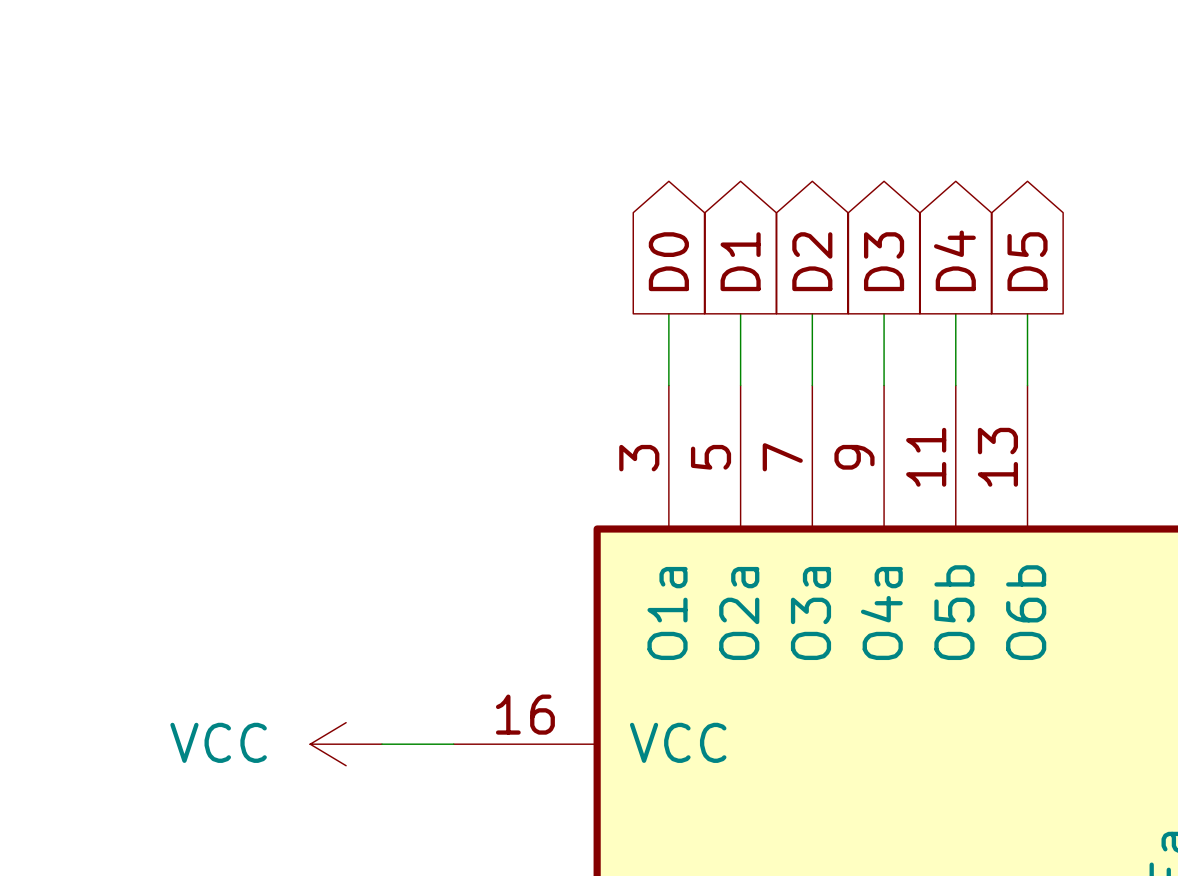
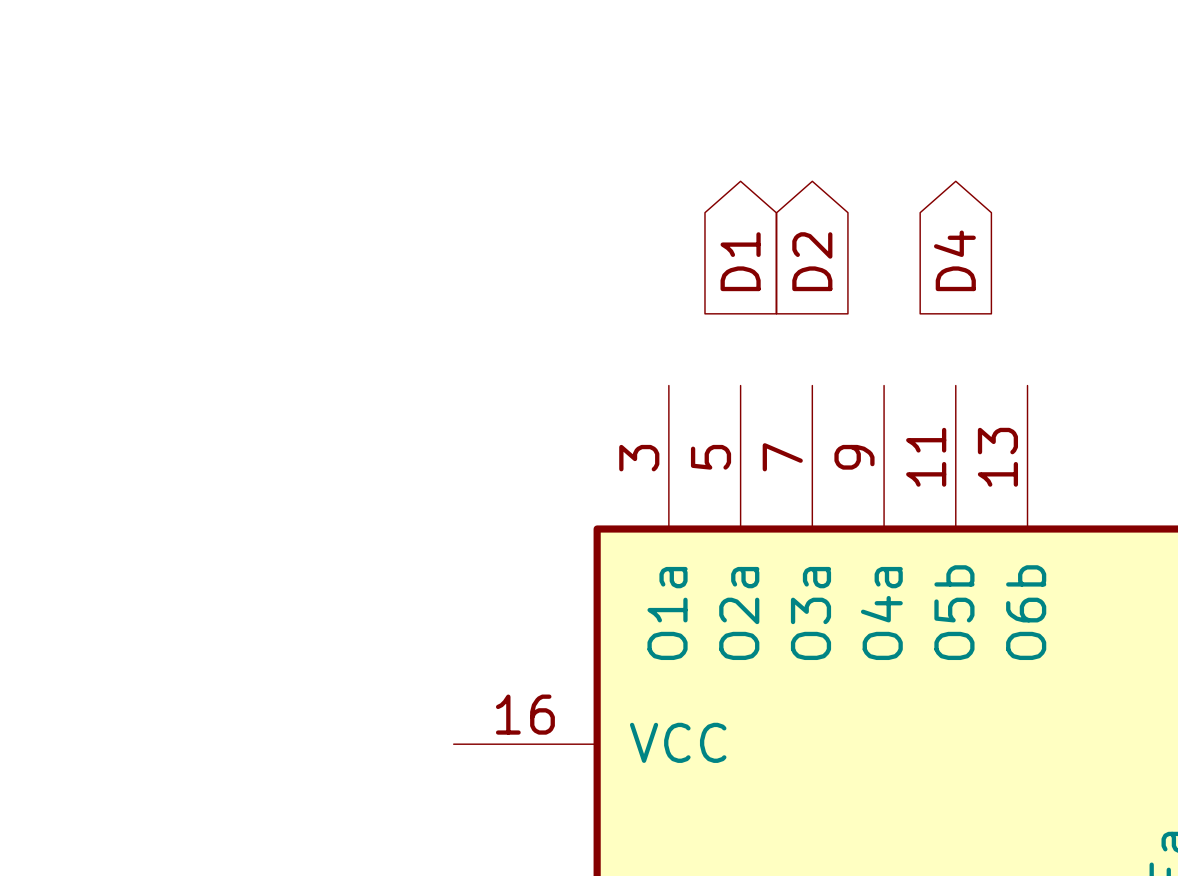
global label: D0 (668, 261) -> none
global label: D3 (884, 261) -> none
global label: D5 (1027, 261) -> none
wire: (668, 313) (668, 385) -> none
wire: (740, 313) (740, 385) -> none
wire: (812, 313) (812, 385) -> none
wire: (884, 313) (884, 385) -> none
wire: (955, 313) (955, 385) -> none
wire: (1027, 313) (1027, 385) -> none
power symbol: VCC (346, 744) -> none
wire: (381, 744) (453, 744) -> none

